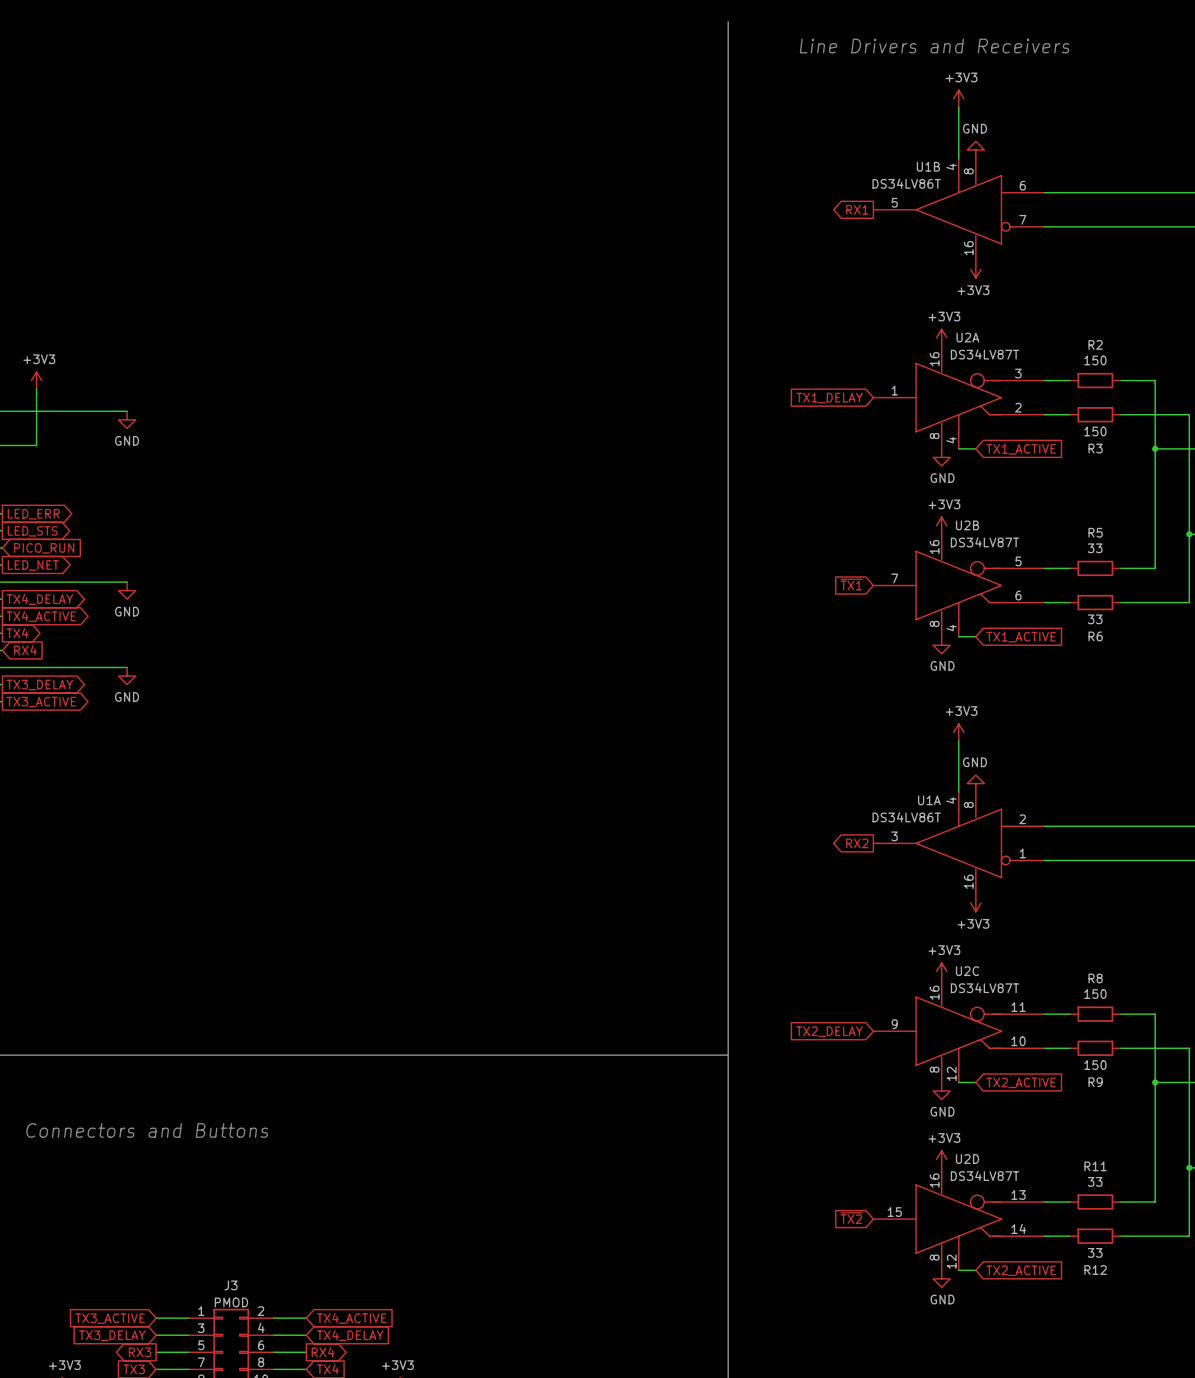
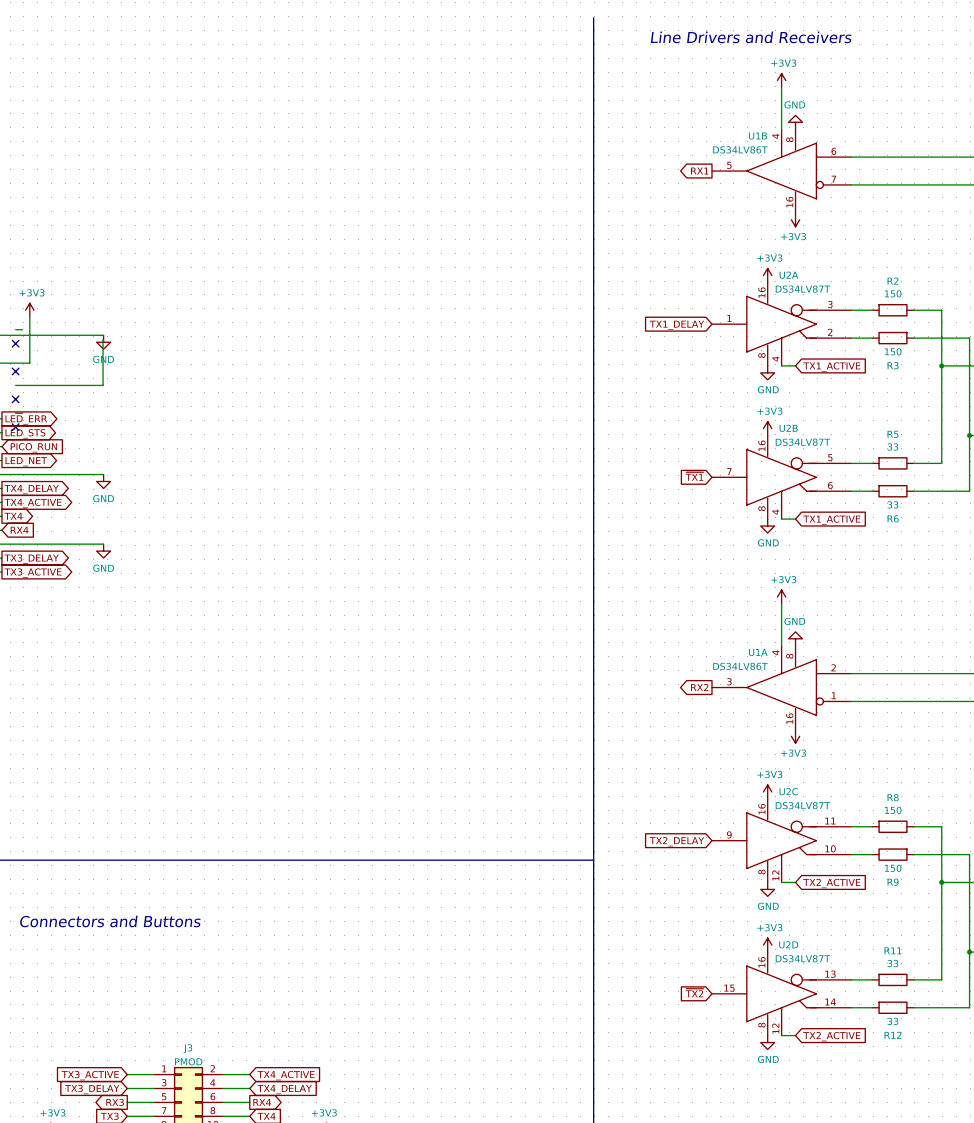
wire: none -> (15, 329) (22, 329)
wire: none -> (103, 339) (103, 385) (15, 385)
no-connect mark: none -> (15, 343)
no-connect mark: none -> (15, 371)
no-connect mark: none -> (15, 399)
wire: none -> (15, 413) (22, 413)
no-connect mark: none -> (15, 427)

